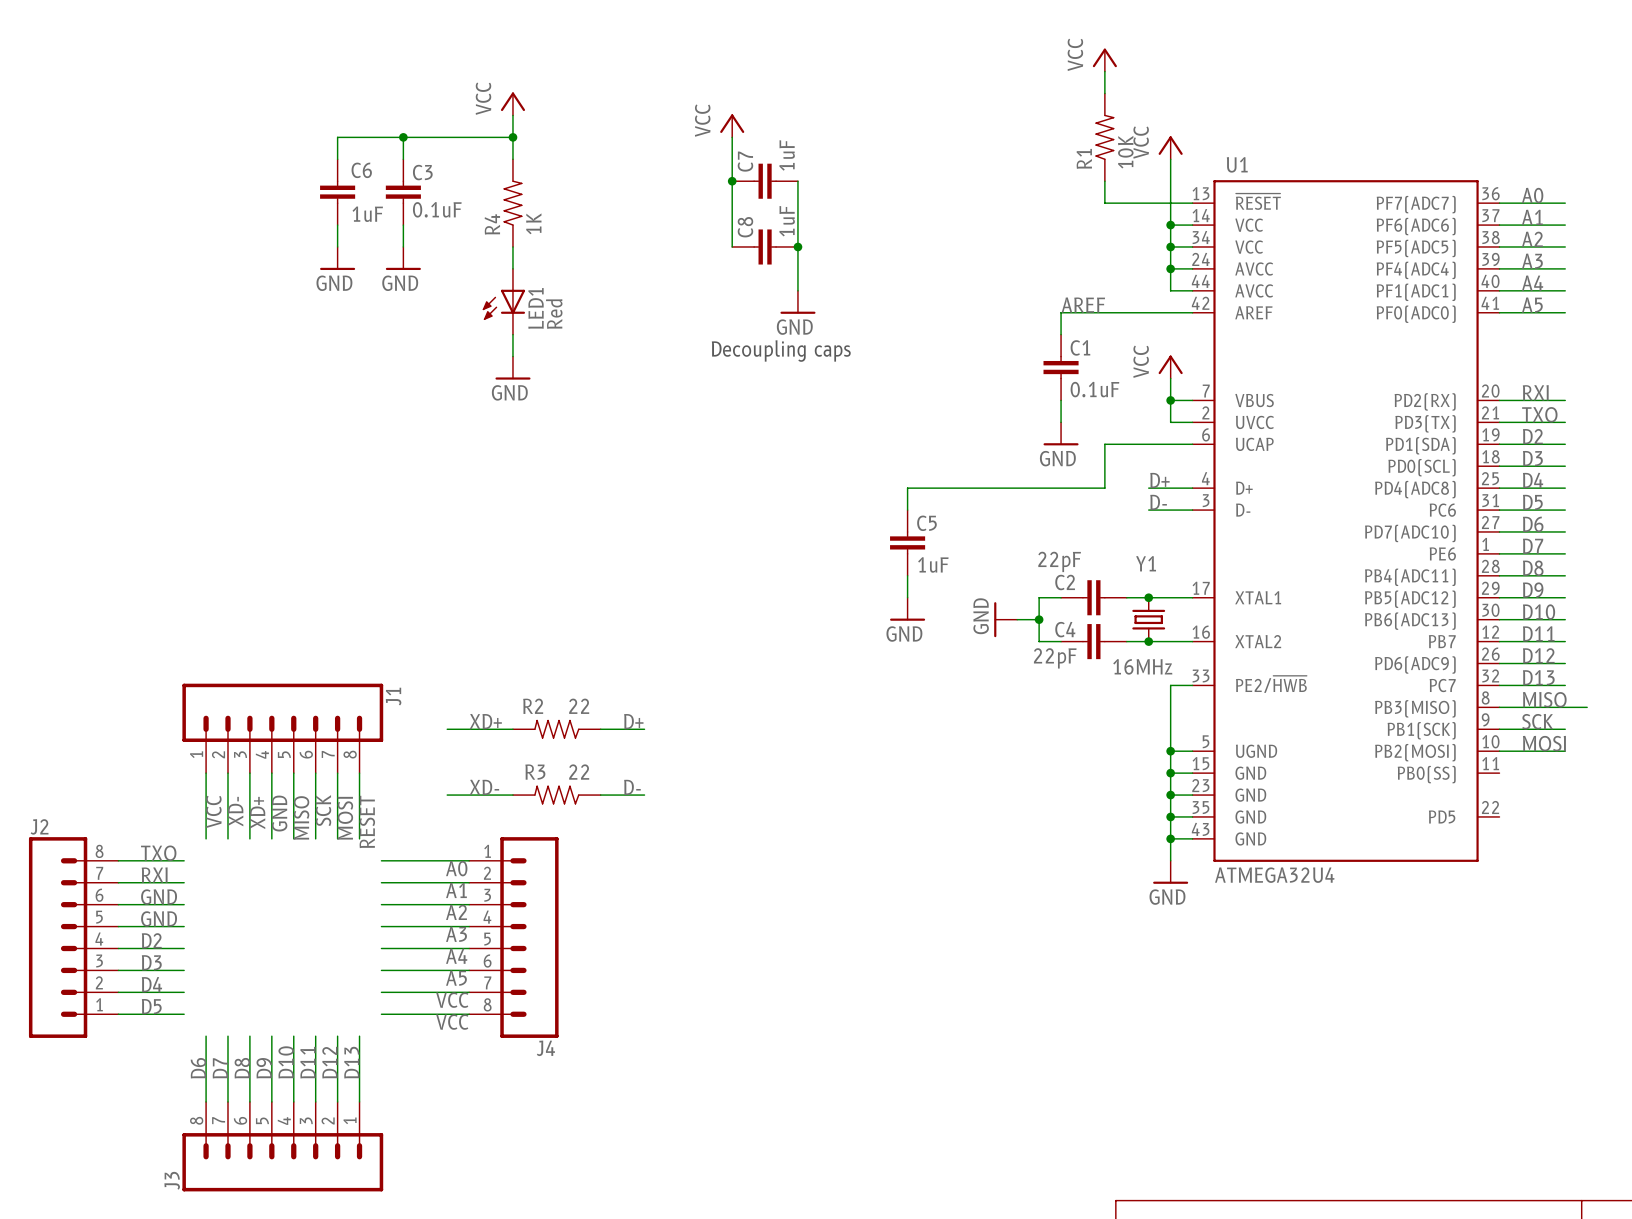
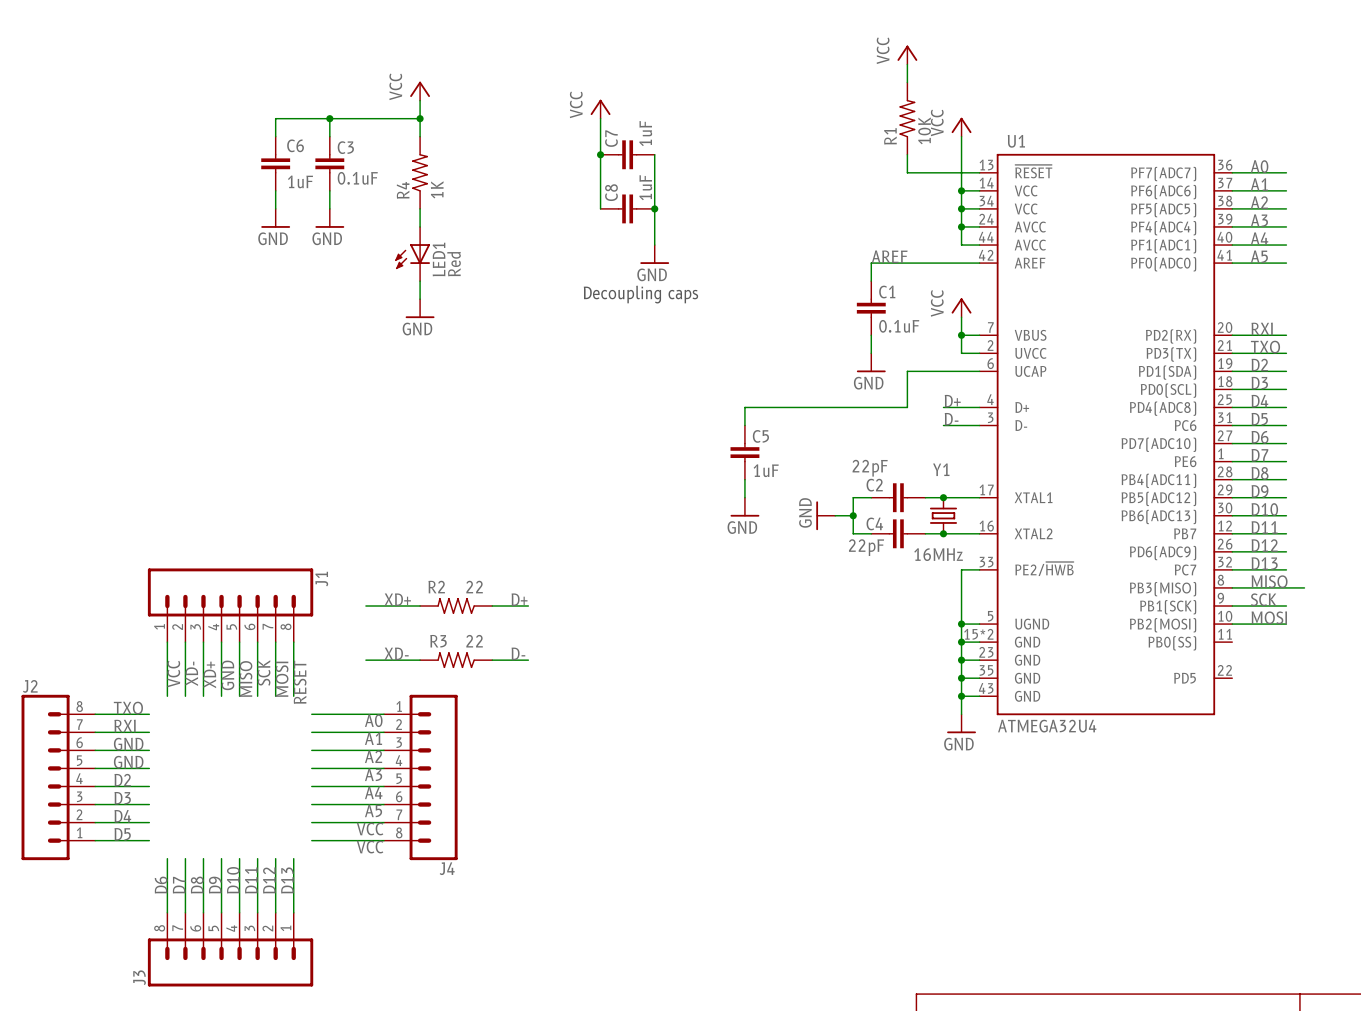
U1 pin number: 15 (1200, 763) -> 15*2 (978, 634)

